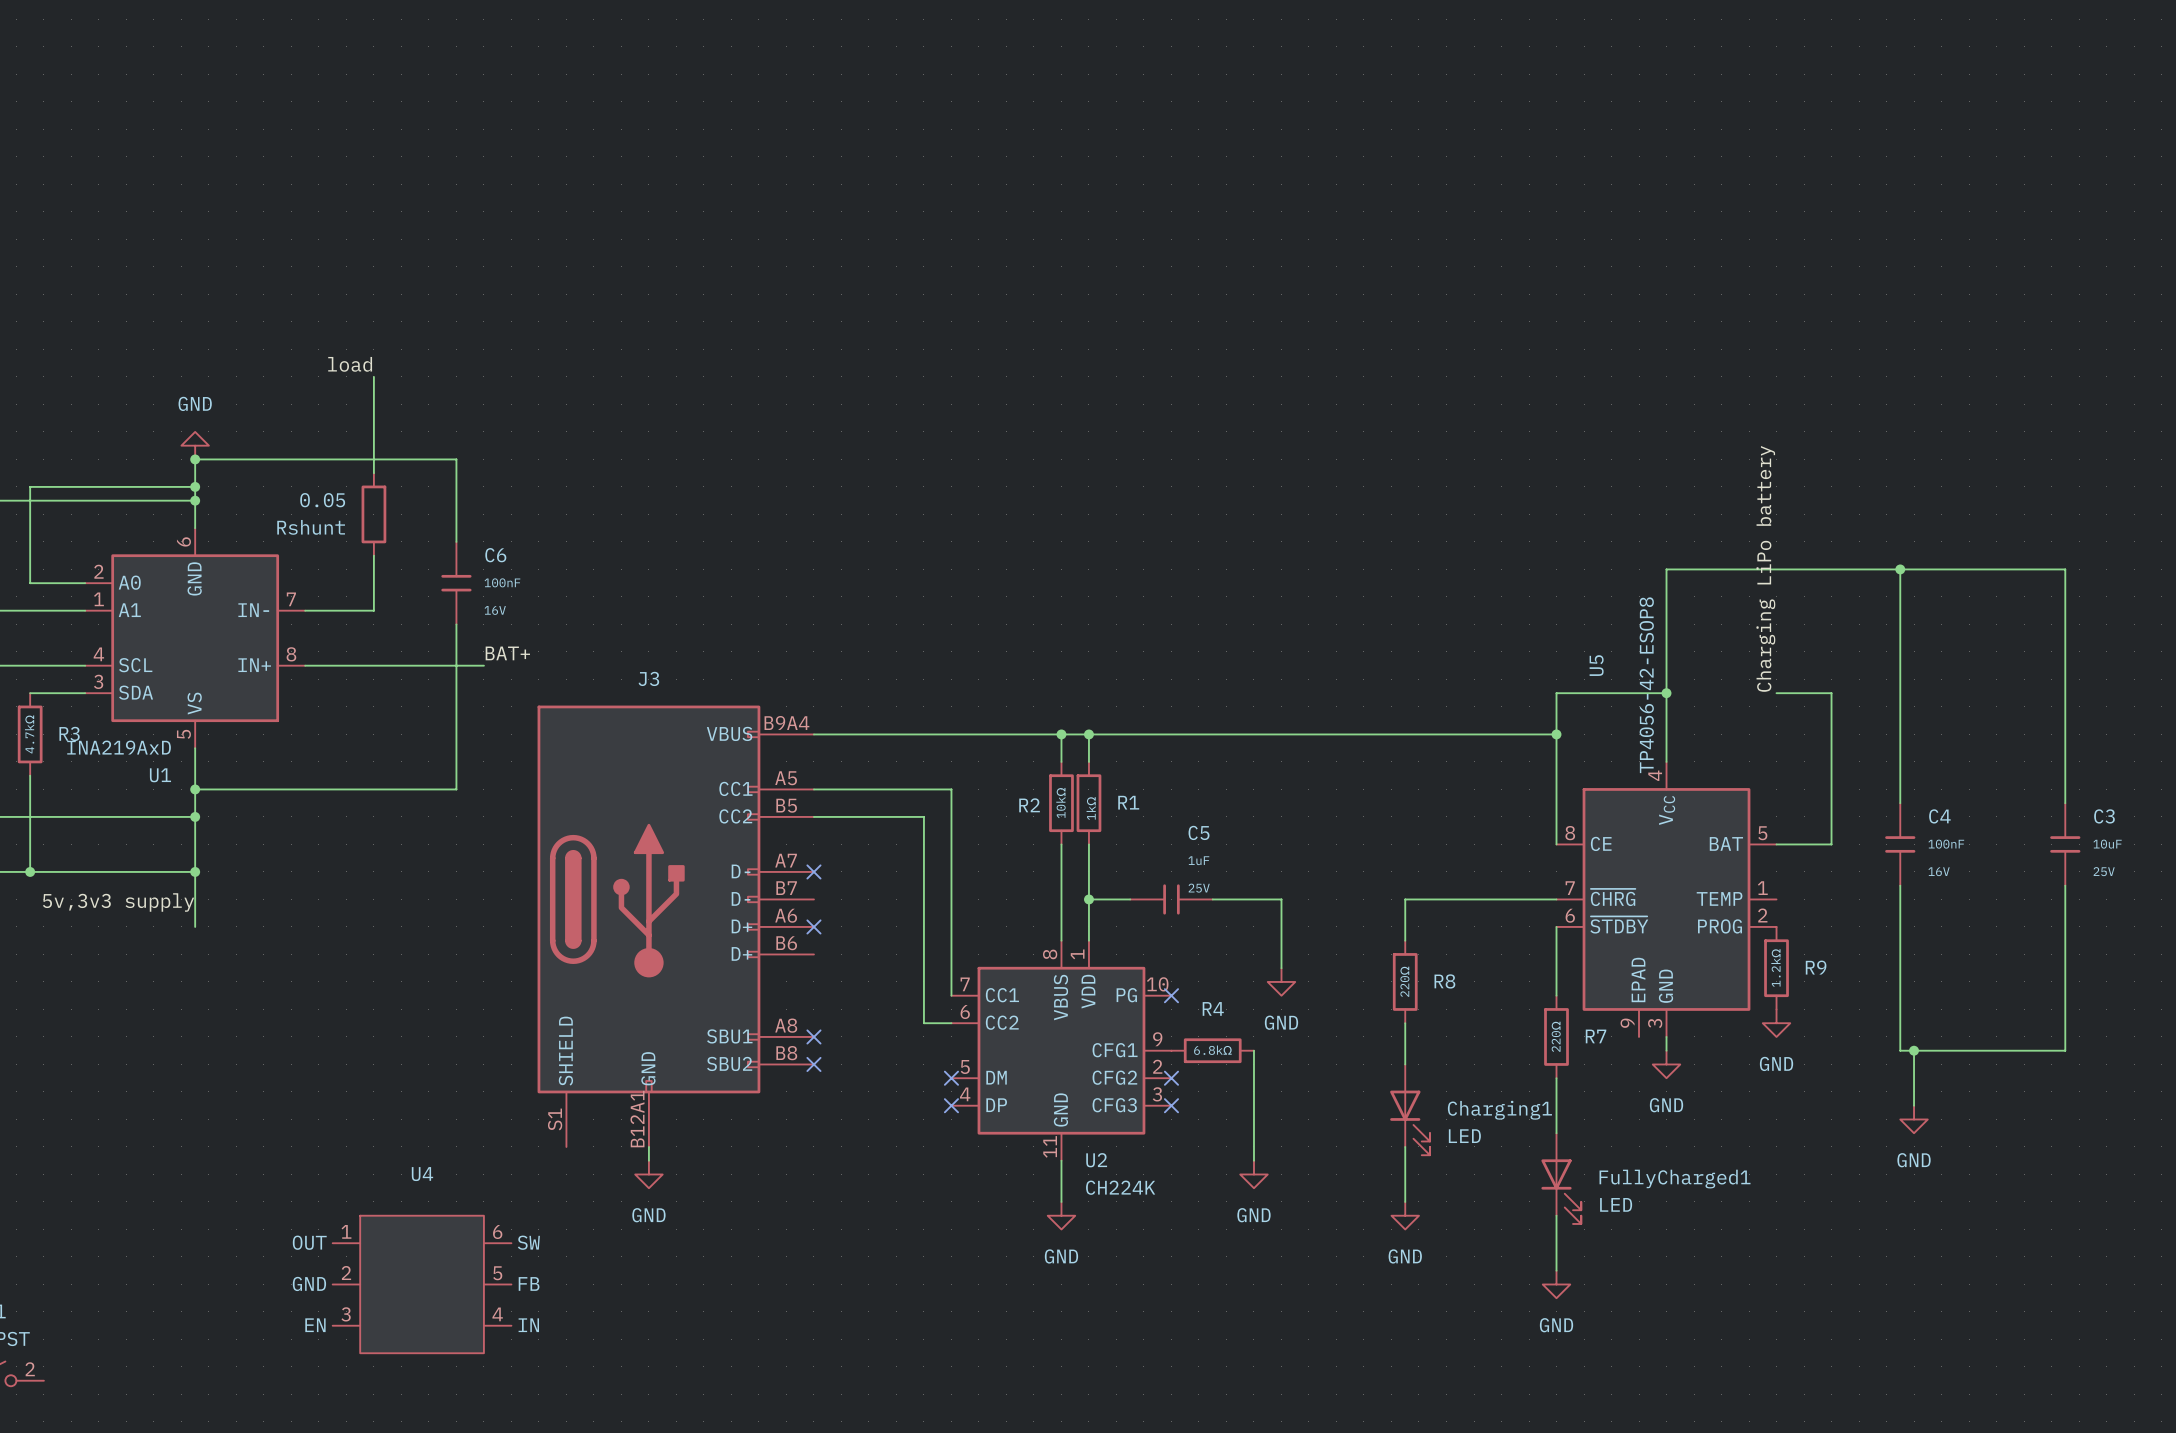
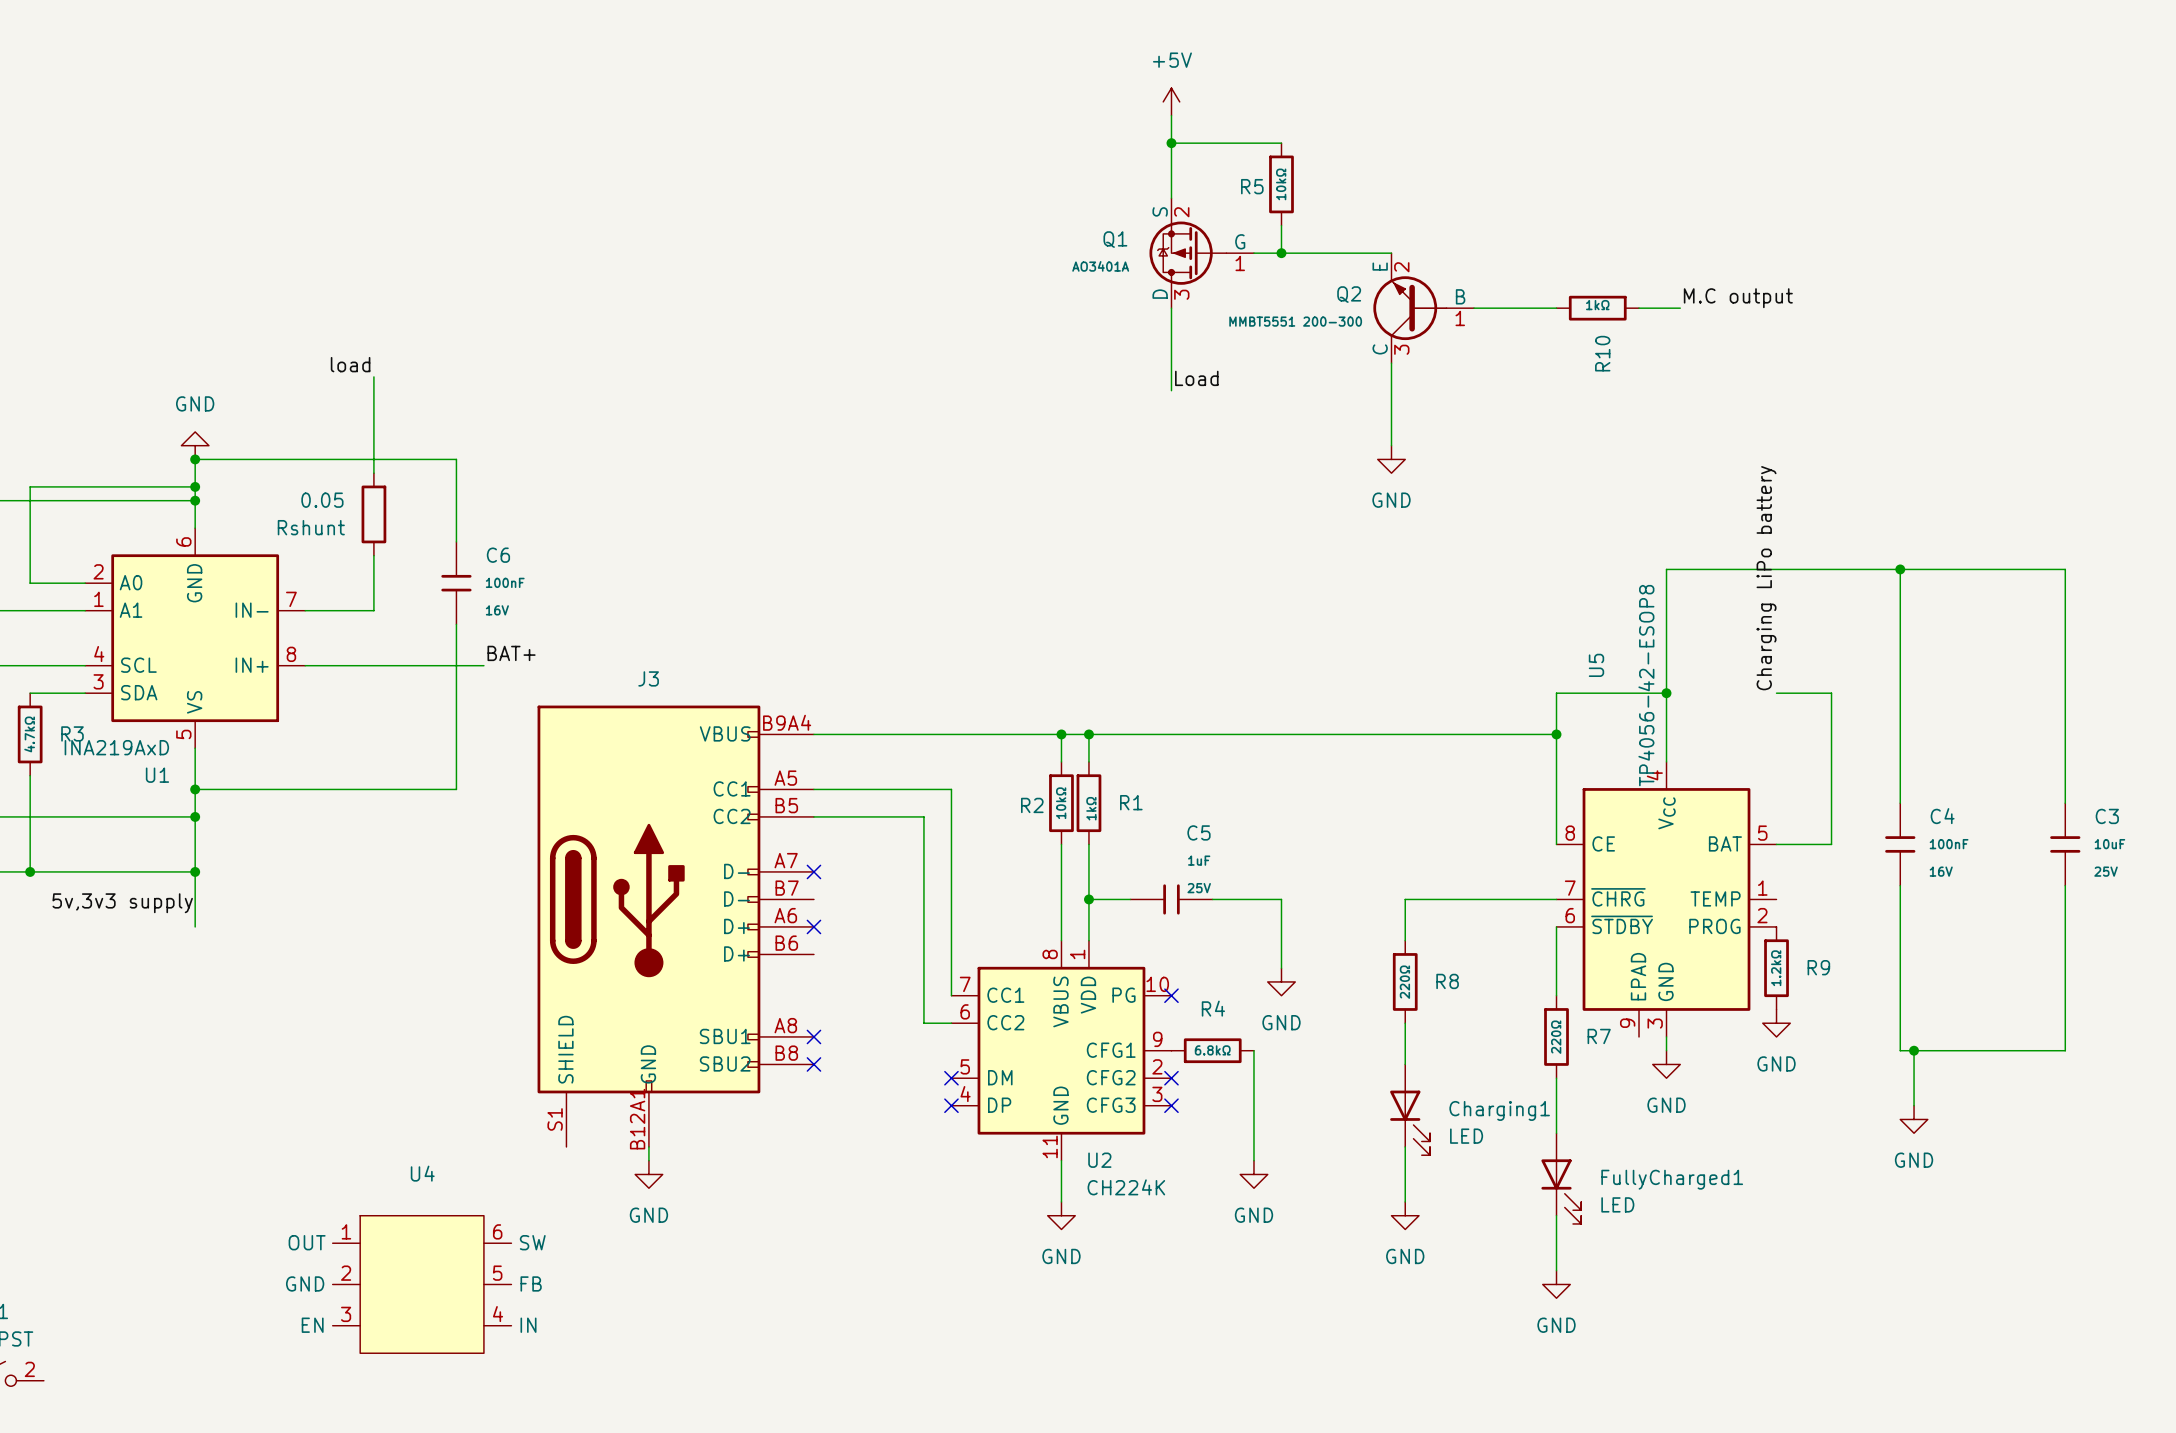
power symbol: none -> +5V (1171, 101)
wire: none -> (1171, 115) (1171, 198)
wire: none -> (1171, 143) (1281, 143)
junction: none -> (1171, 143)
R5: none -> 10kΩ (1281, 184)
wire: none -> (1281, 225) (1281, 253)
Q1: none -> AO3401A (1201, 253)
wire: none -> (1253, 253) (1391, 253)
junction: none -> (1281, 253)
label: none -> M.C output (1738, 298)
wire: none -> (1171, 308) (1171, 390)
Q2: none -> MMBT5551 200-300 (1423, 308)
wire: none -> (1474, 308) (1556, 308)
R10: none -> 1kΩ (1597, 308)
wire: none -> (1639, 308) (1680, 308)
wire: none -> (1391, 363) (1391, 445)
label: none -> Load (1196, 378)
power symbol: none -> GND (1391, 459)

